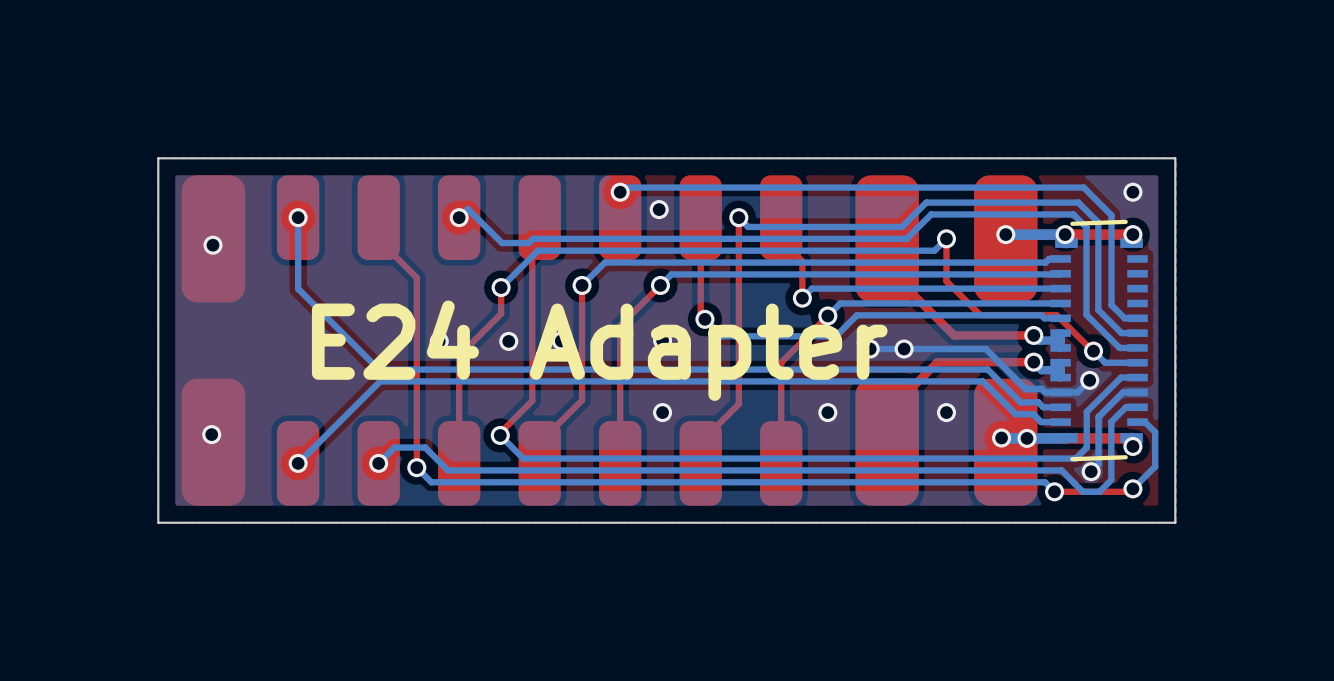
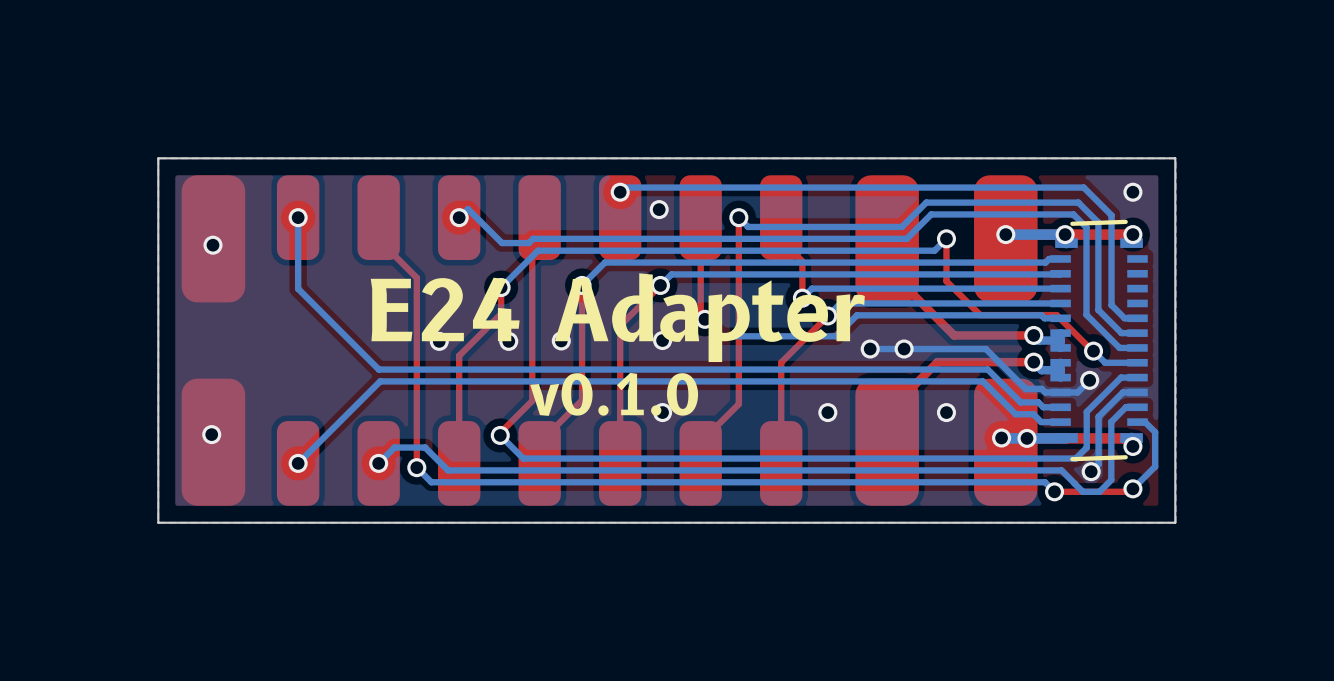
text position: E24 Adapter (599, 350) -> E24 Adapter (617, 317)
text: none -> v0.1.0 (614, 394)

